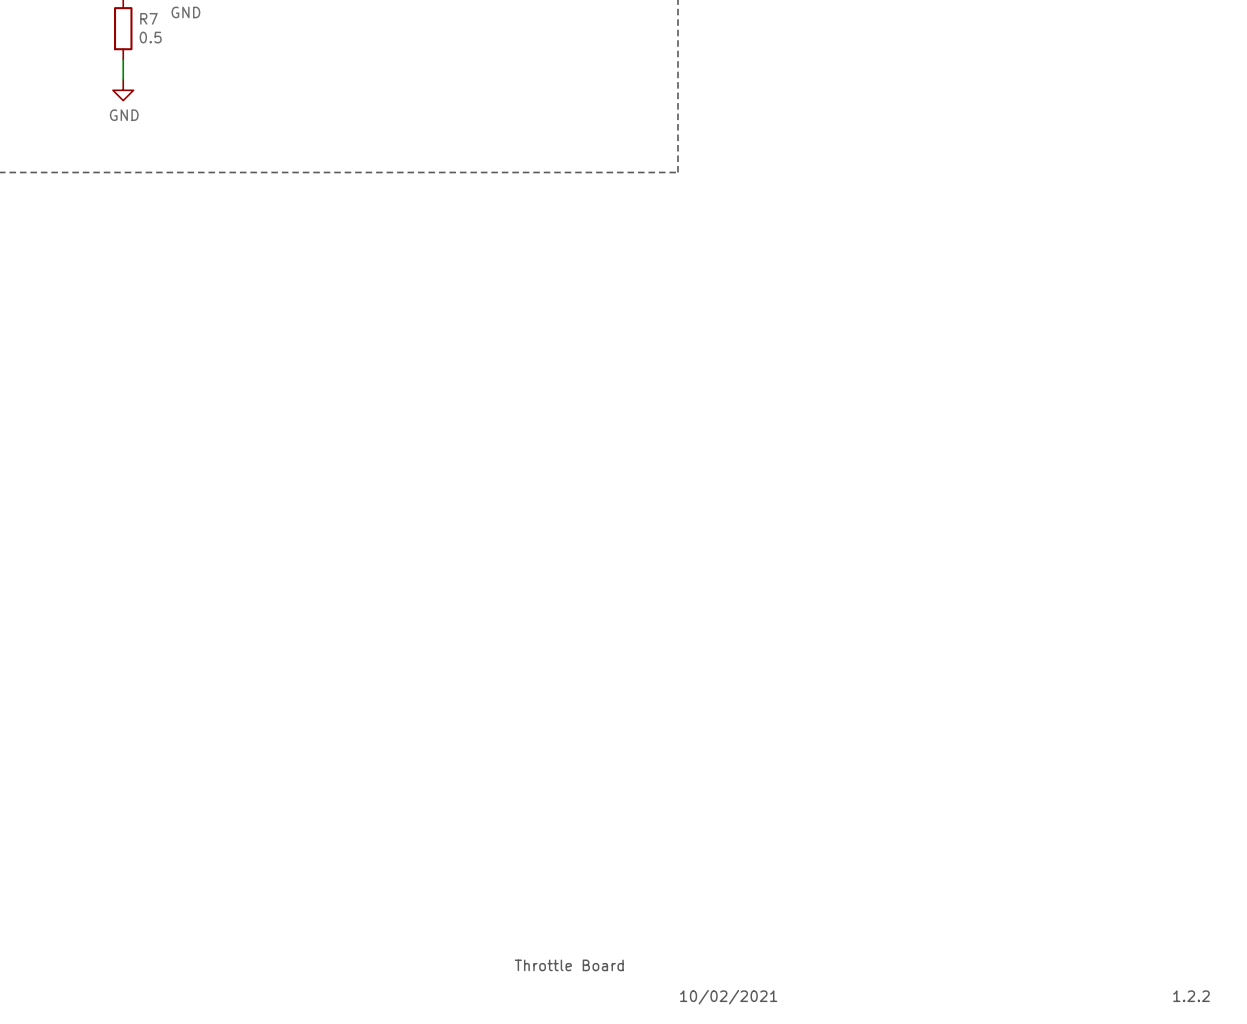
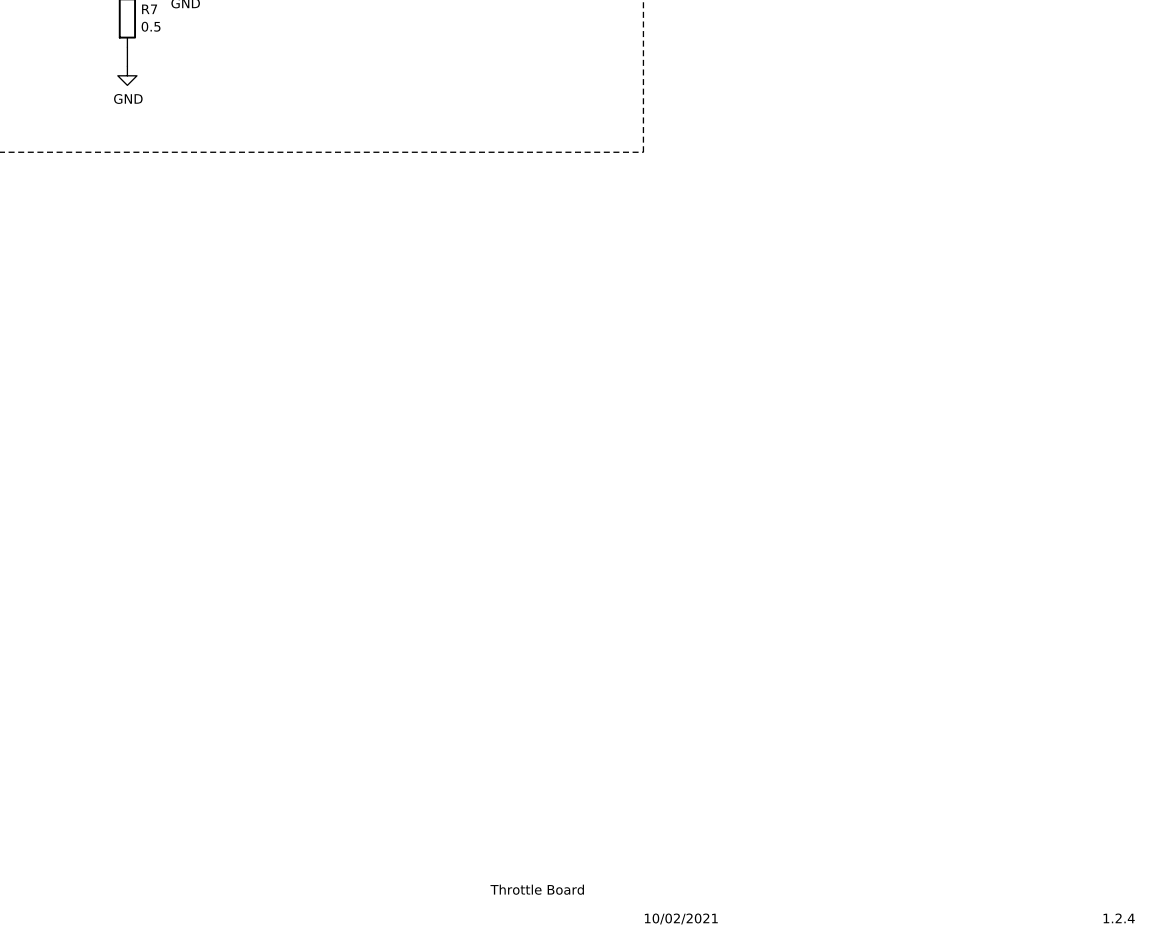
text: 1.2.2 (1191, 996) -> 1.2.4 (1119, 918)

